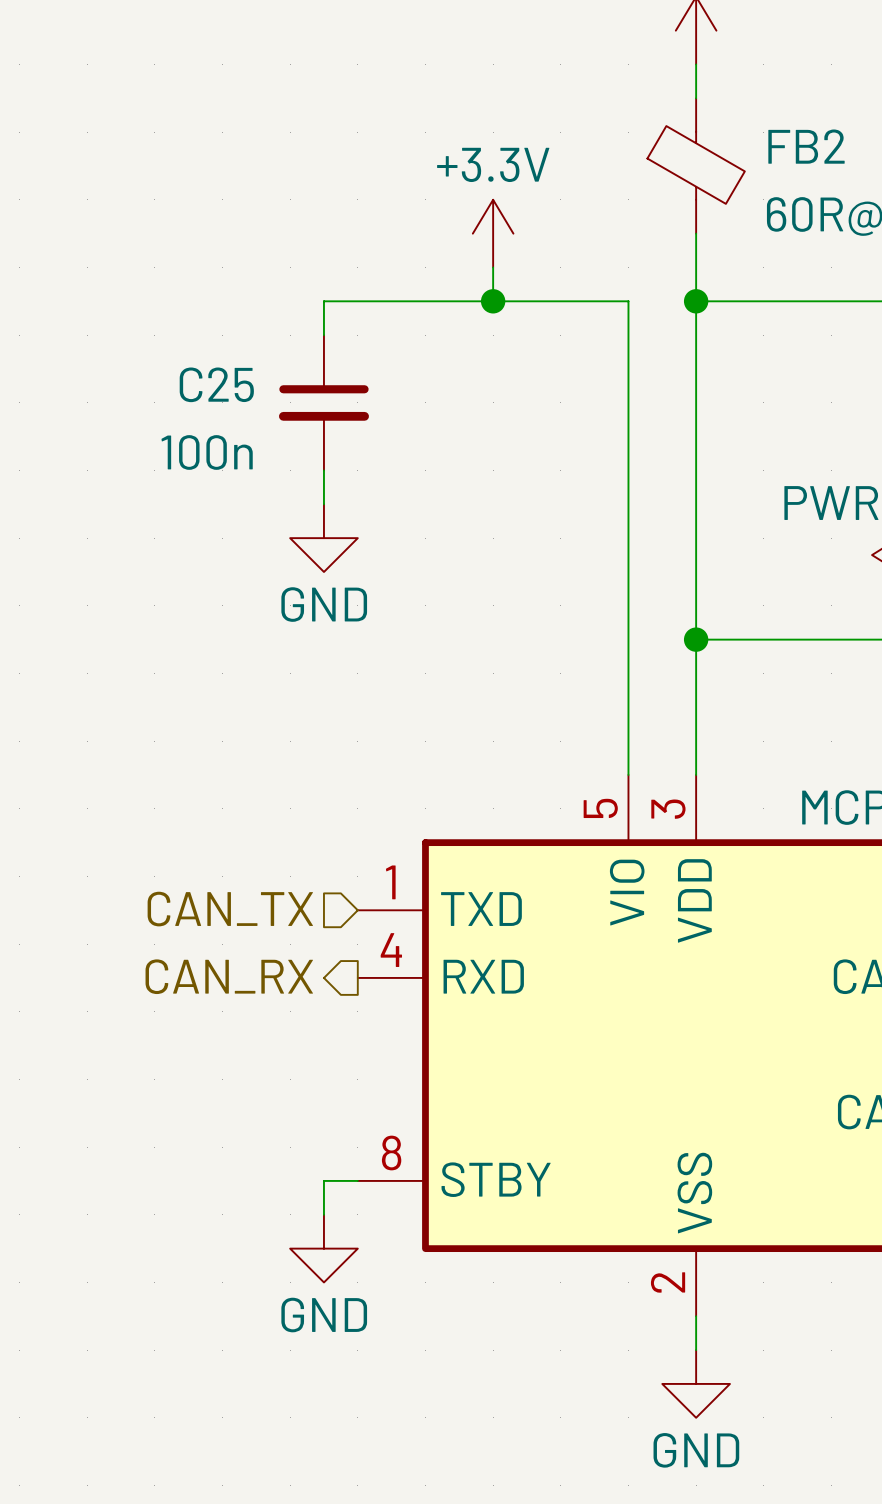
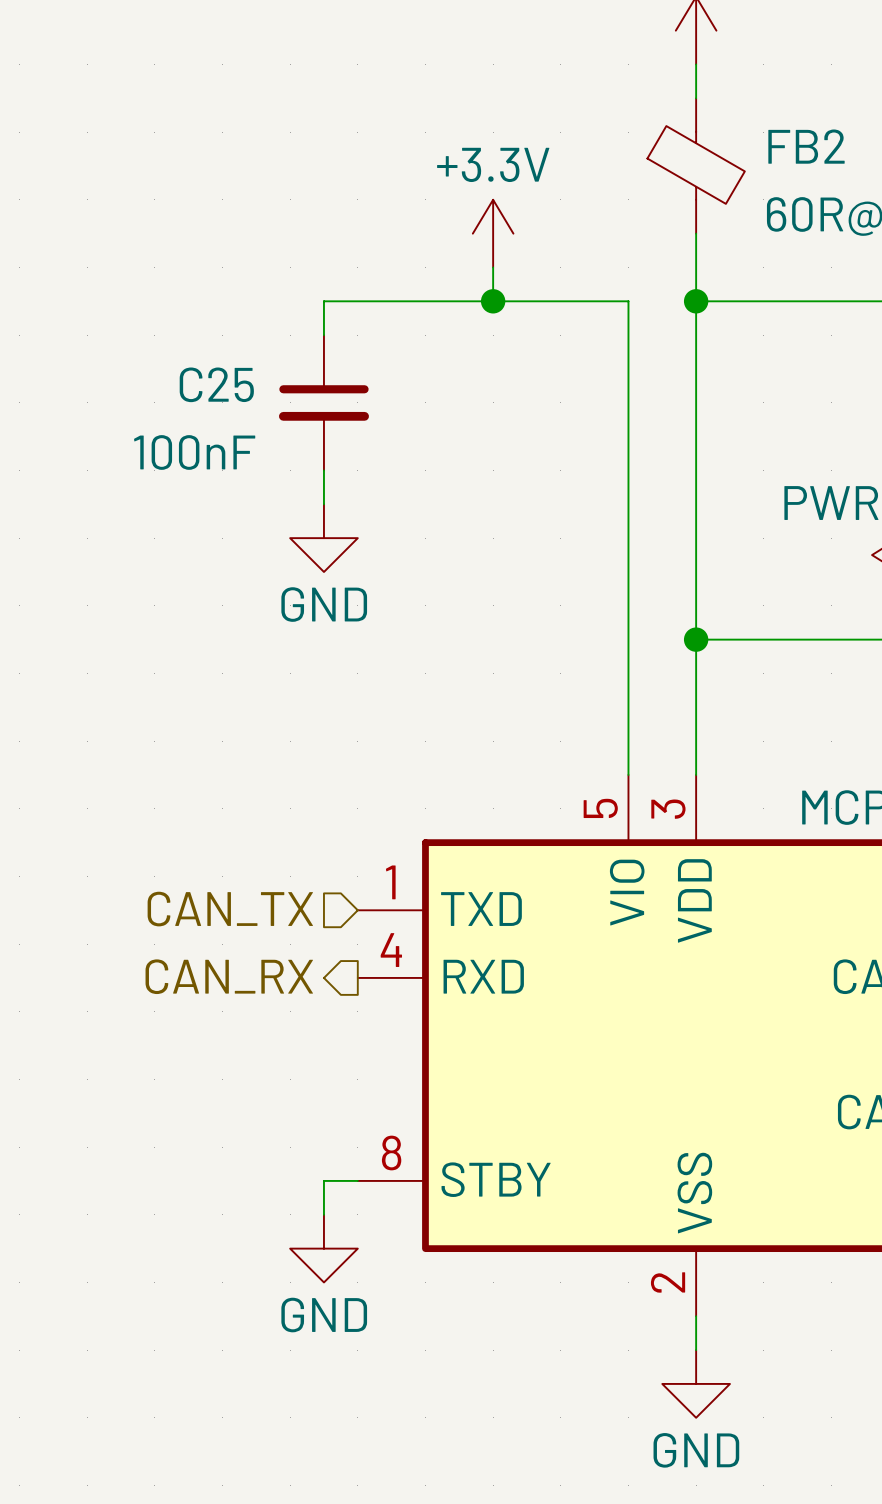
C25 value: 100n (207, 452) -> 100nF (194, 452)

